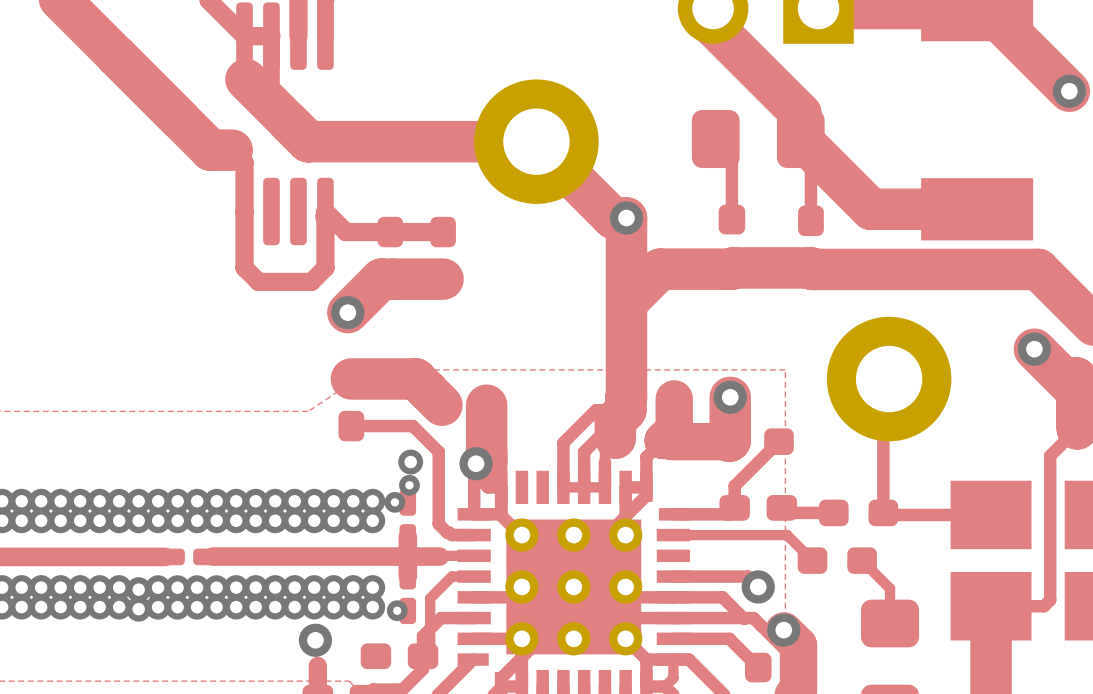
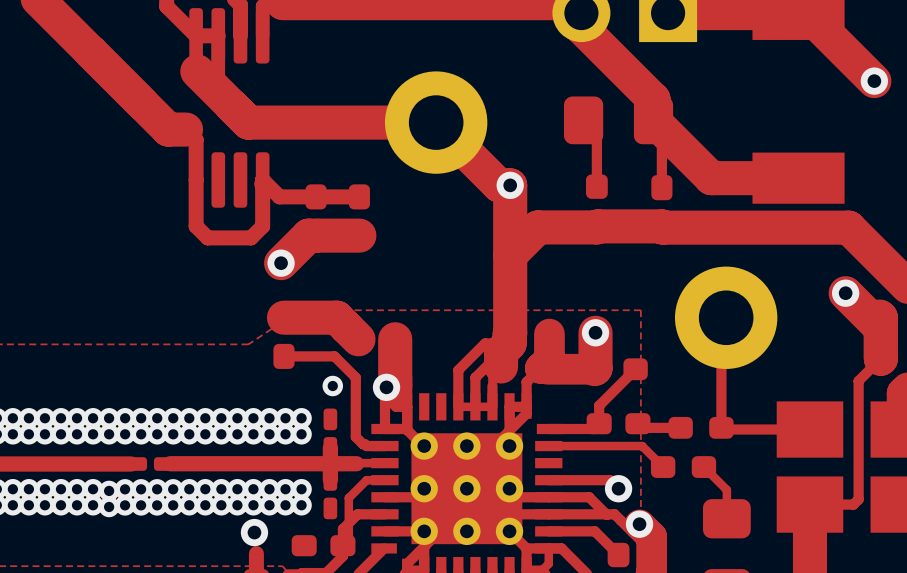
via: (409, 485) -> none
via: (394, 502) -> none
via: (397, 610) -> none

